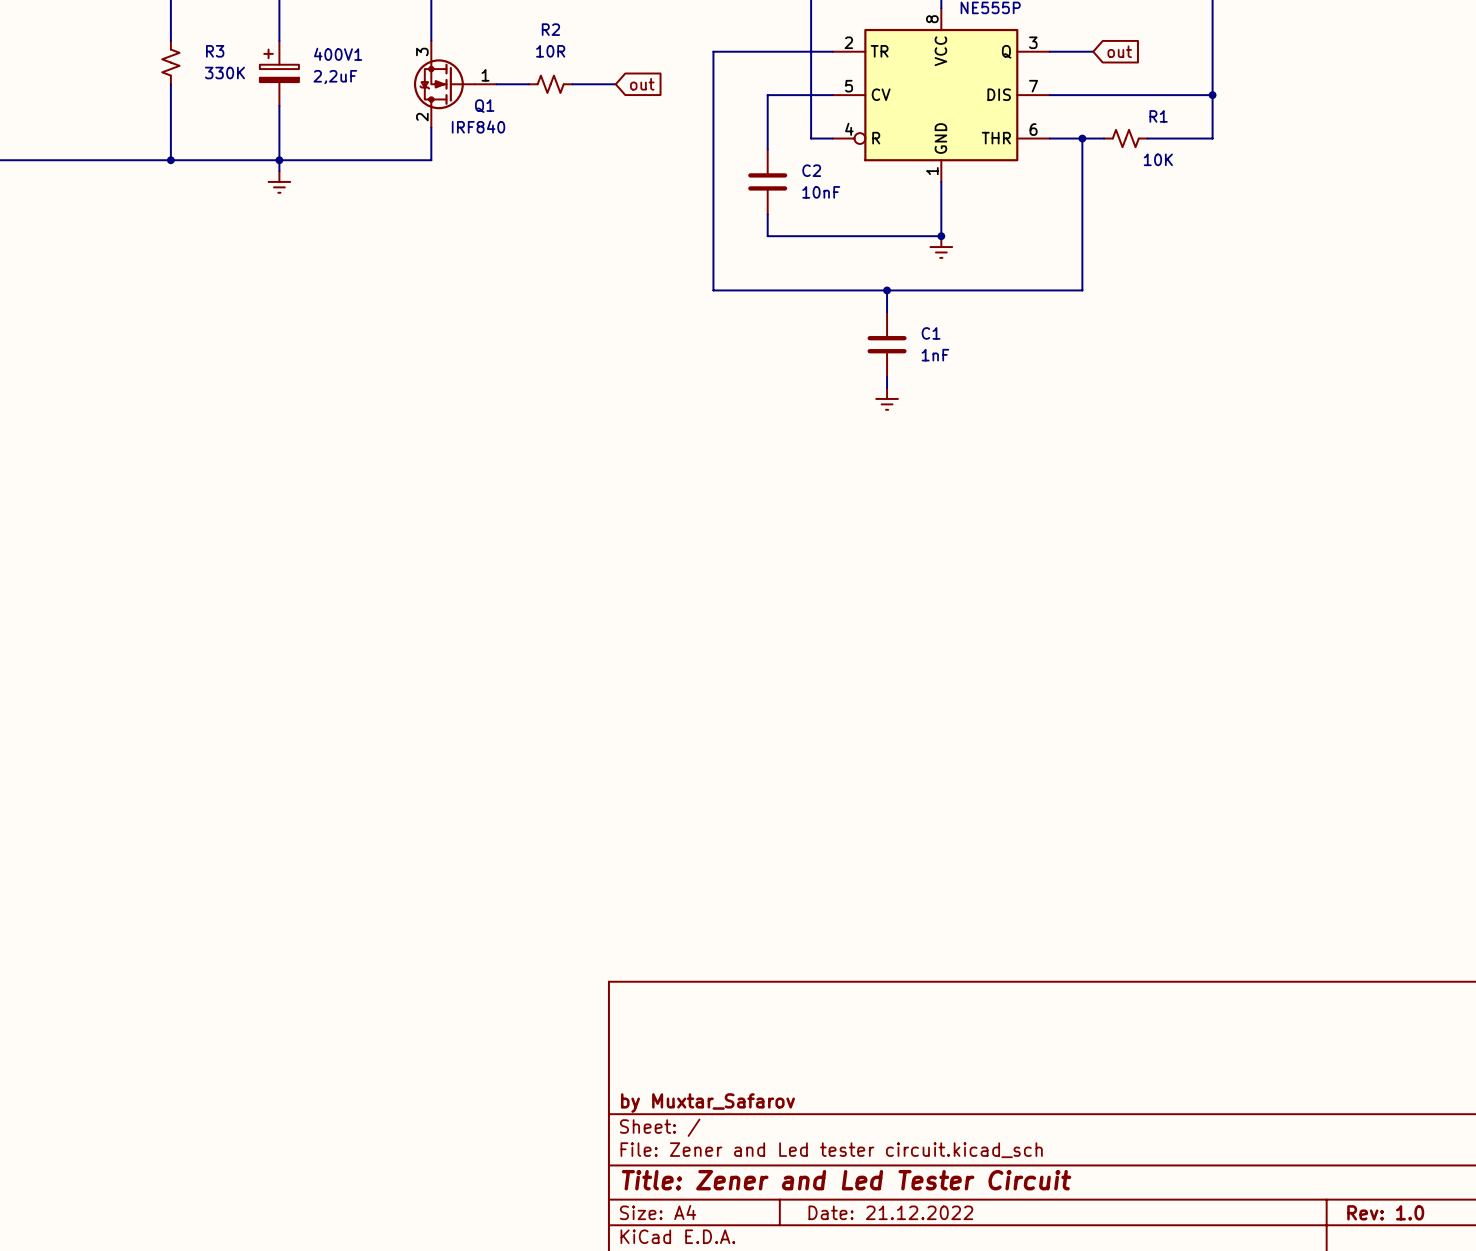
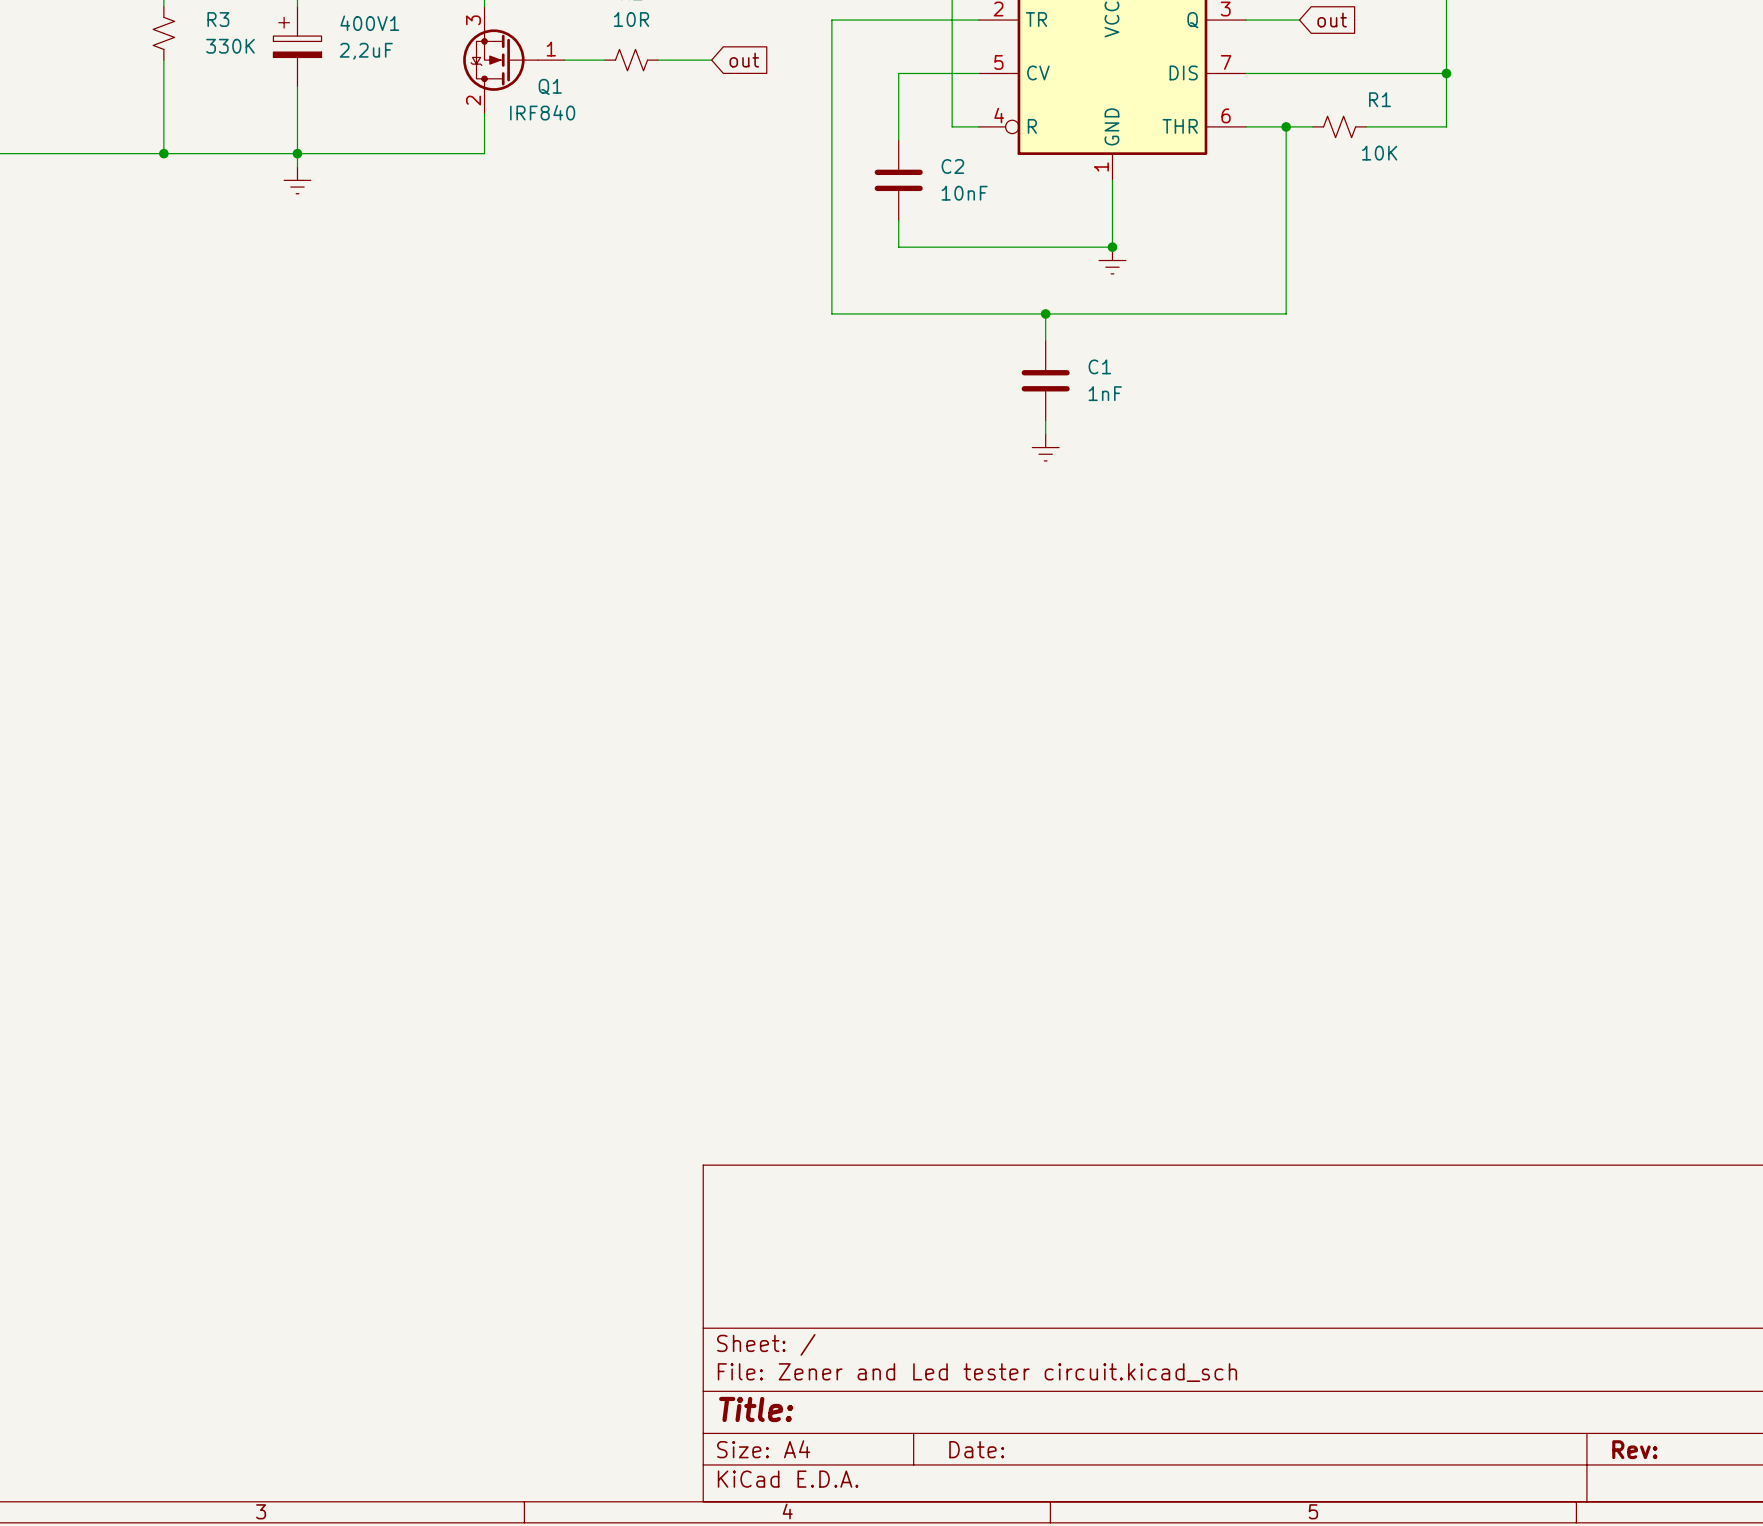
title block: by Muxtar_Safarov (707, 1103) -> none
title block: Title: Zener and Led Tester Circuit (846, 1180) -> Title: (756, 1409)
title block: Date: 21.12.2022 (890, 1212) -> Date: (976, 1449)
title block: Rev: 1.0 (1385, 1212) -> Rev: (1634, 1449)

